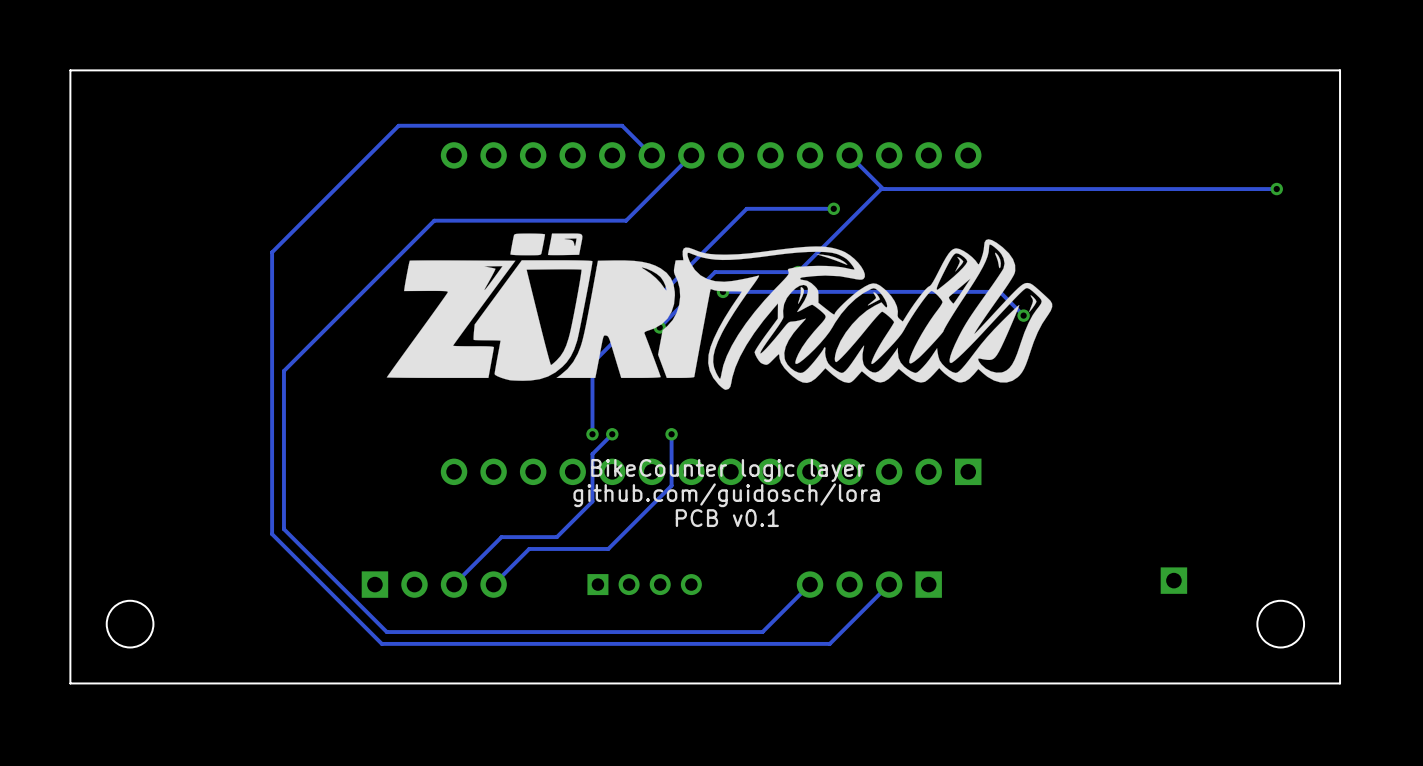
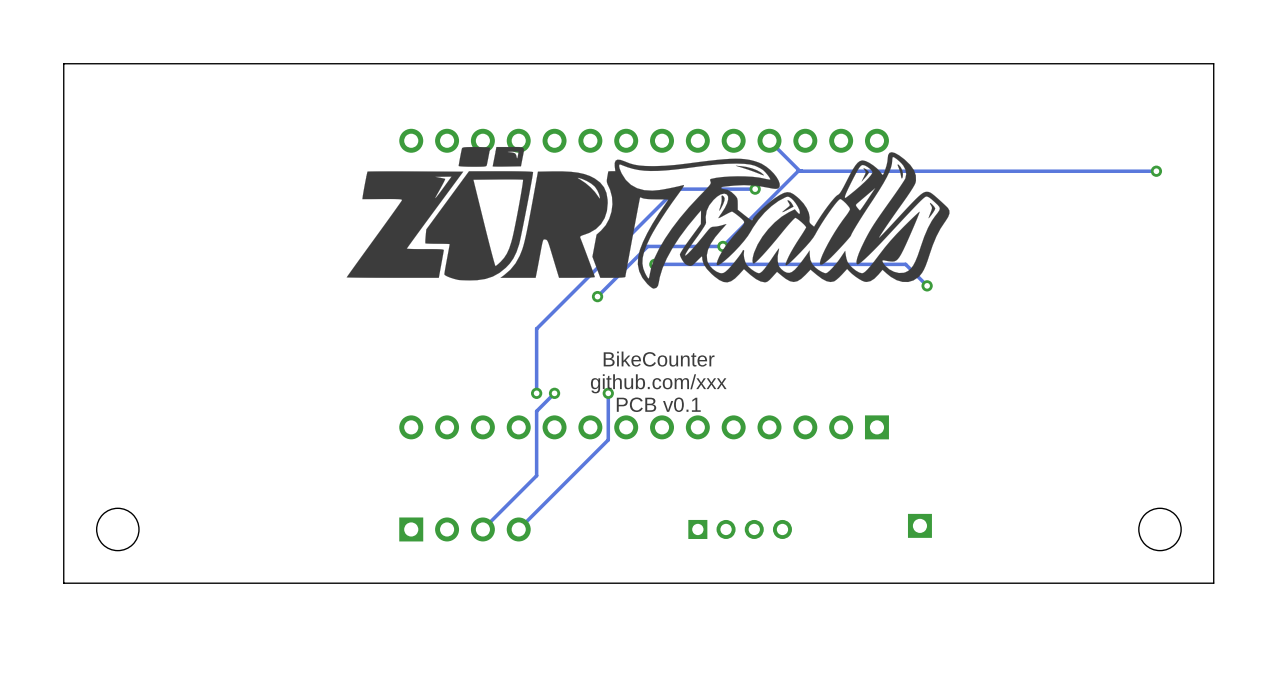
track: (651, 155) (622, 125) (398, 125) (272, 252) (272, 534) (381, 643) (829, 643) (889, 584) -> none
track: (691, 155) (626, 220) (434, 220) (283, 370) (283, 529) (386, 632) (762, 632) (810, 584) -> none
drawing position: (719, 311) -> (648, 217)
text: none -> BikeCounter (659, 359)
text: none -> github.com/xxx (658, 383)
text: BikeCounter logic layer (728, 470) -> none
text: github.com/guidosch/lora (726, 495) -> none
track: (592, 501) (556, 537) (501, 537) (454, 584) -> (536, 454) (536, 475) (482, 529)
text position: PCB v0.1 (727, 518) -> PCB v0.1 (658, 404)
track: (608, 548) (529, 548) (493, 584) -> (550, 497) (518, 529)
part position: (1173, 580) -> (919, 525)
part position: (434, 584) -> (464, 529)
part position: (644, 584) -> (740, 529)
part: (869, 584) -> none
round board edge position: (130, 624) -> (117, 529)
round board edge position: (1280, 624) -> (1159, 529)
board edge: (1340, 643) (1340, 683) (70, 683) (70, 643) -> (1213, 583) (63, 583)

